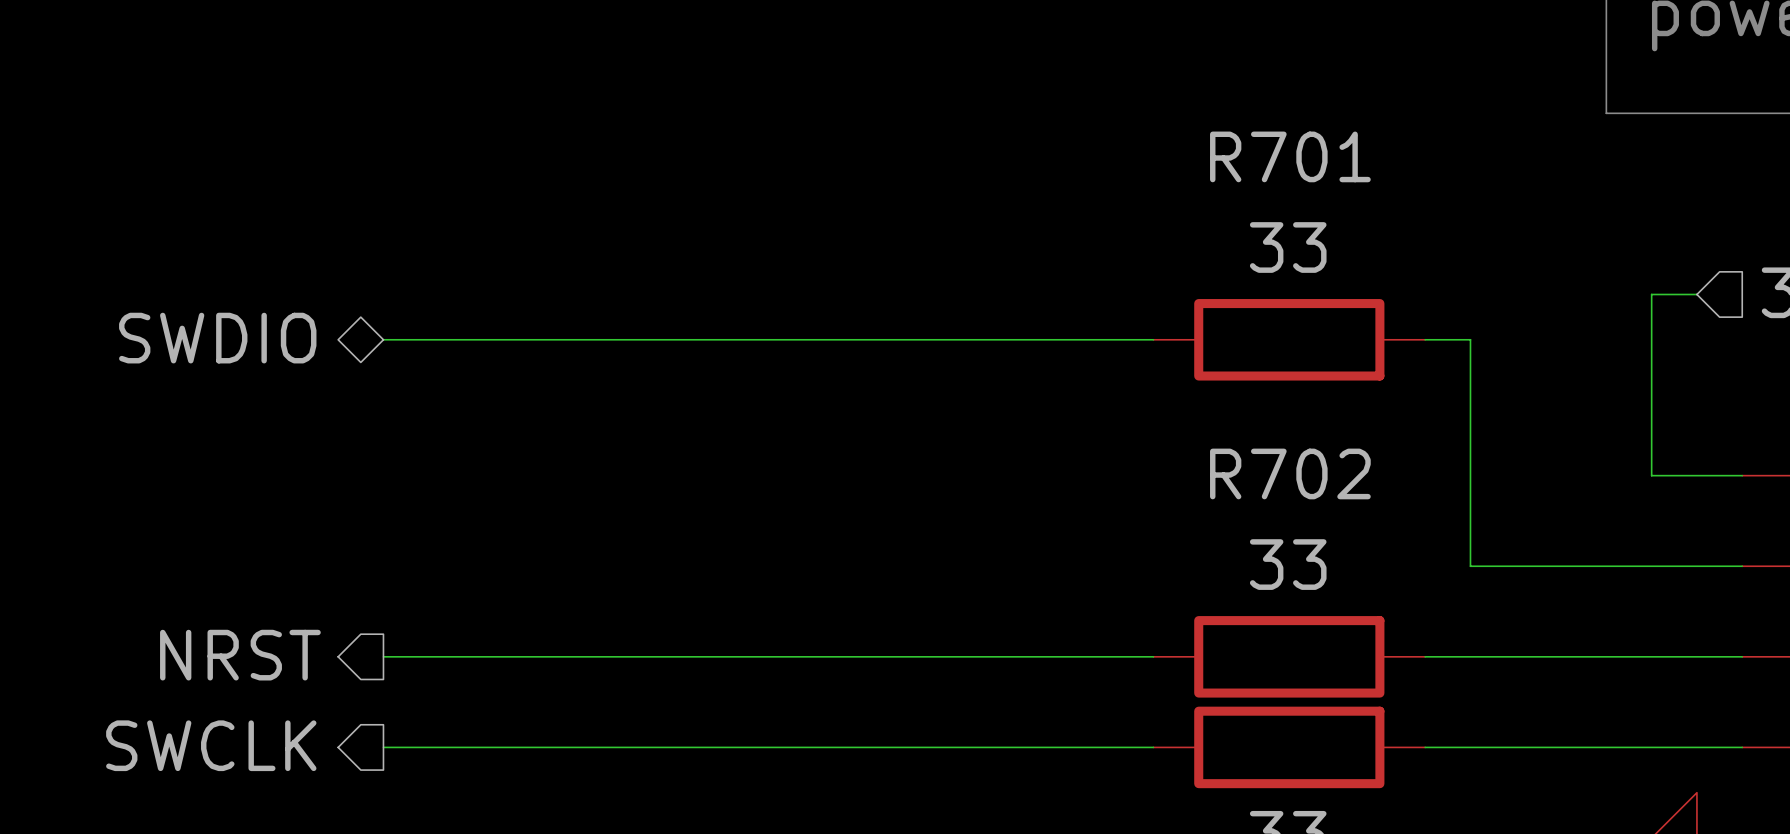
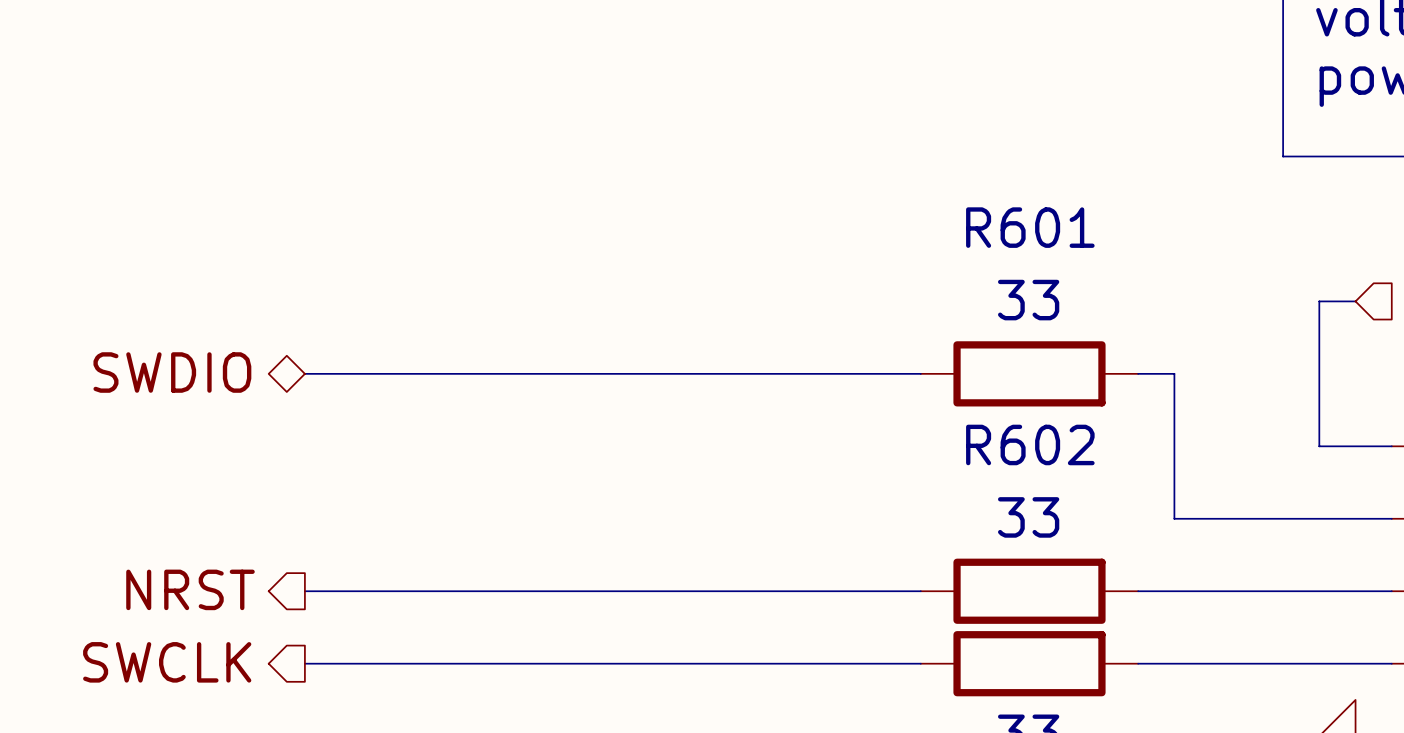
hierarchical label position: SWDIO (217, 338) -> SWDIO (172, 372)
wire: (383, 339) (1153, 339) -> (304, 373) (920, 373)
R701: 33 (1289, 339) -> none
wire: (1425, 339) (1470, 339) (1470, 385) -> (1138, 373) (1174, 373)
R601: none -> 33 (1029, 373)
R702 name: R702 (1290, 473) -> R602 (1030, 444)

